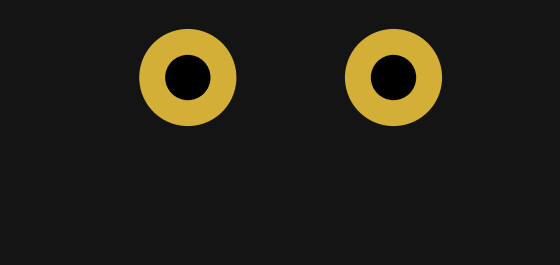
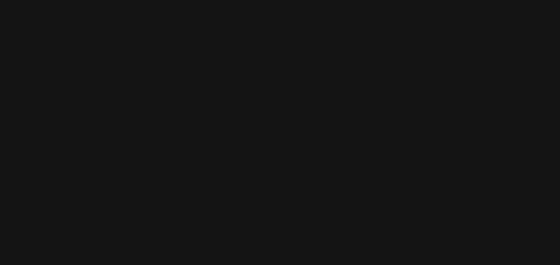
part: (187, 77) -> none
part: (393, 77) -> none

